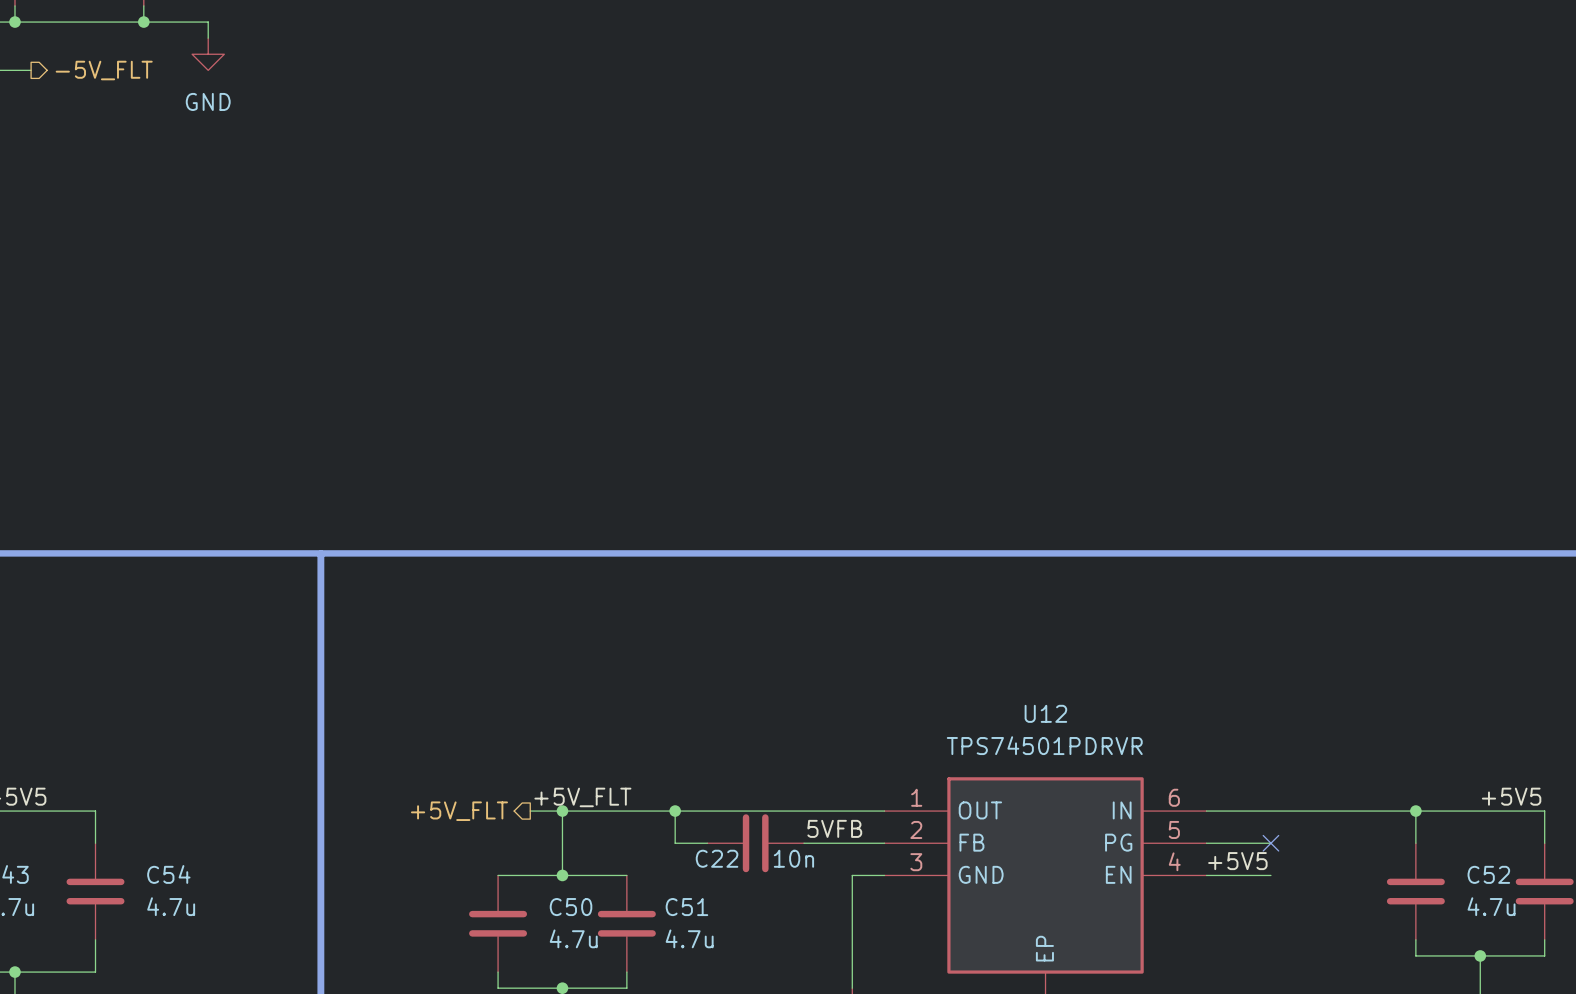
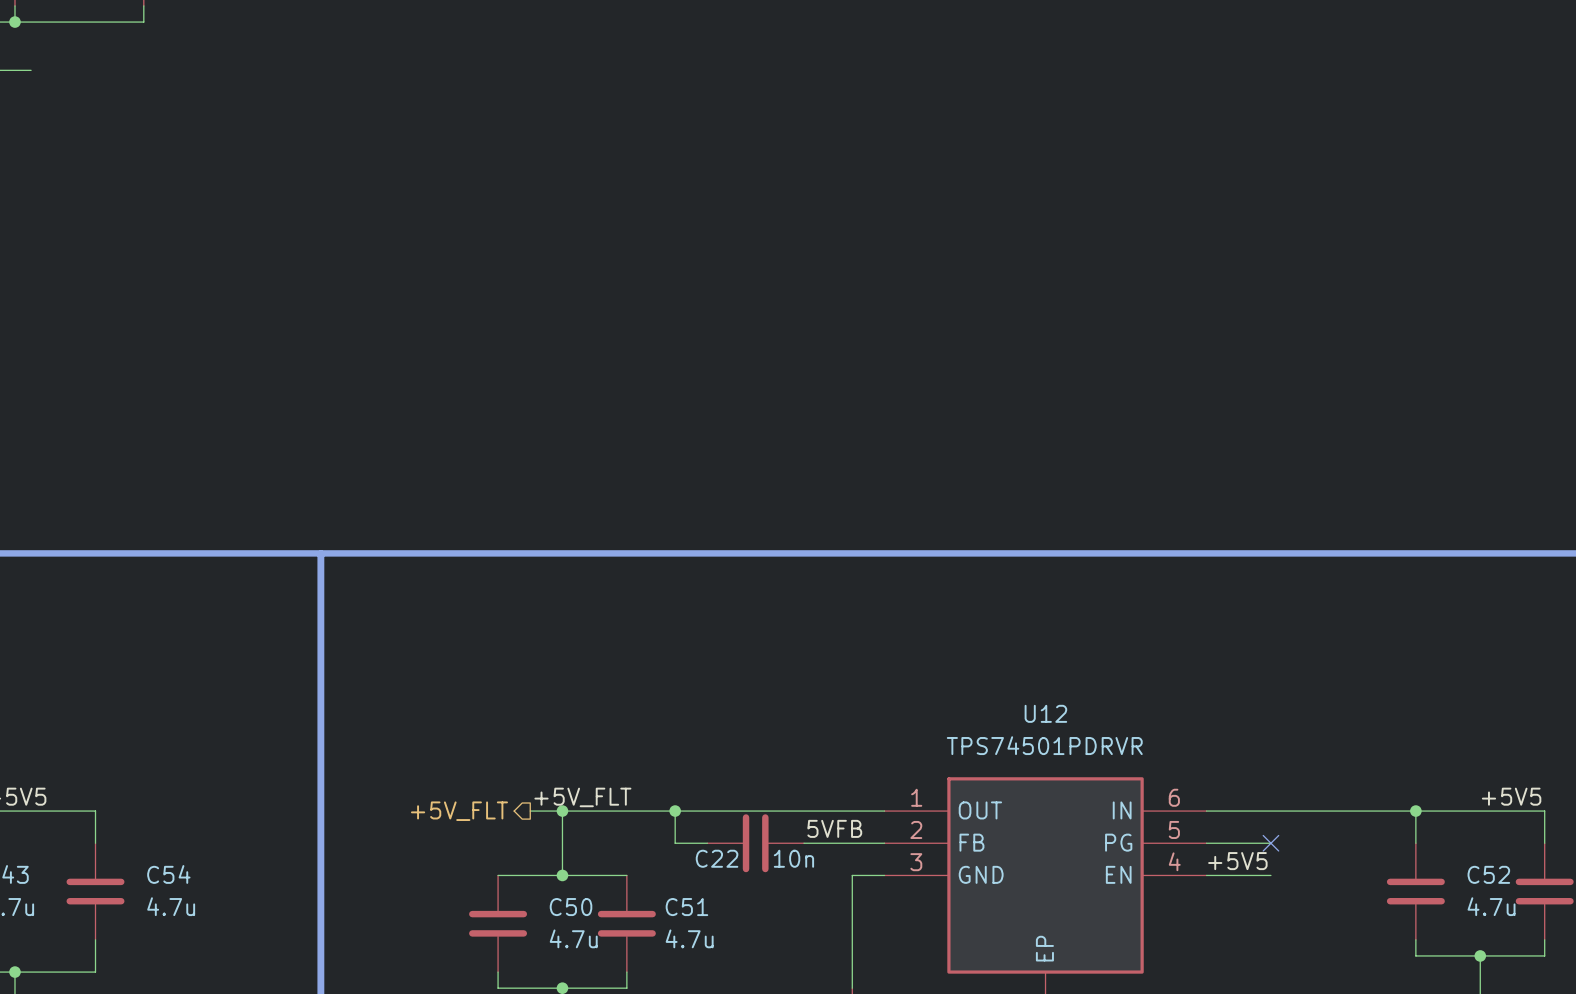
wire: (143, 22) (208, 22) (208, 38) -> none
junction: (143, 22) -> none
power symbol: GND (208, 54) -> none
hierarchical label: -5V_FLT (104, 70) -> none

